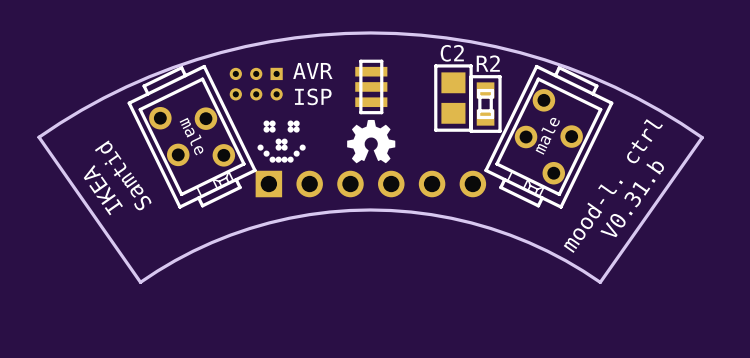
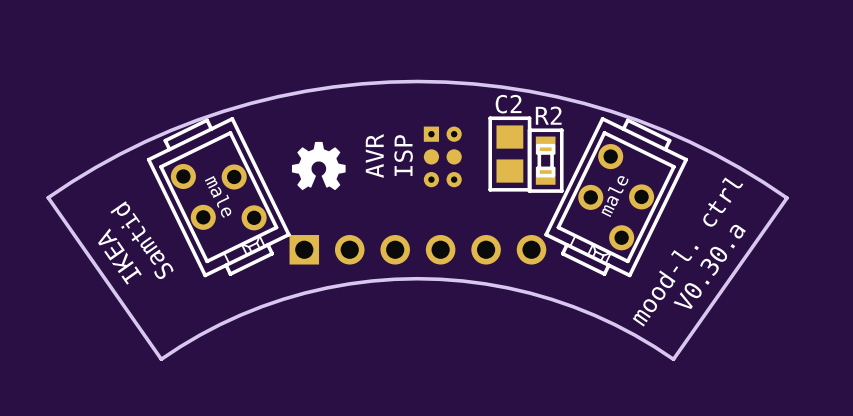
text rotation: 0° (312, 70) -> 90° counterclockwise (374, 155)
part: (256, 84) -> none
part: (371, 86) -> none
text rotation: 0° (313, 96) -> 90° counterclockwise (403, 155)
part: none -> (442, 156)
drawing: [257, 120, 306, 163] -> none
drawing position: (371, 141) -> (318, 166)
text: V0.31.b (632, 199) -> V0.30.a (709, 266)

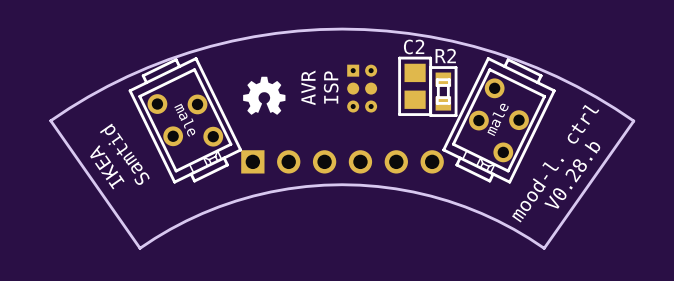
text: V0.30.a (709, 266) -> V0.28.b (572, 175)

